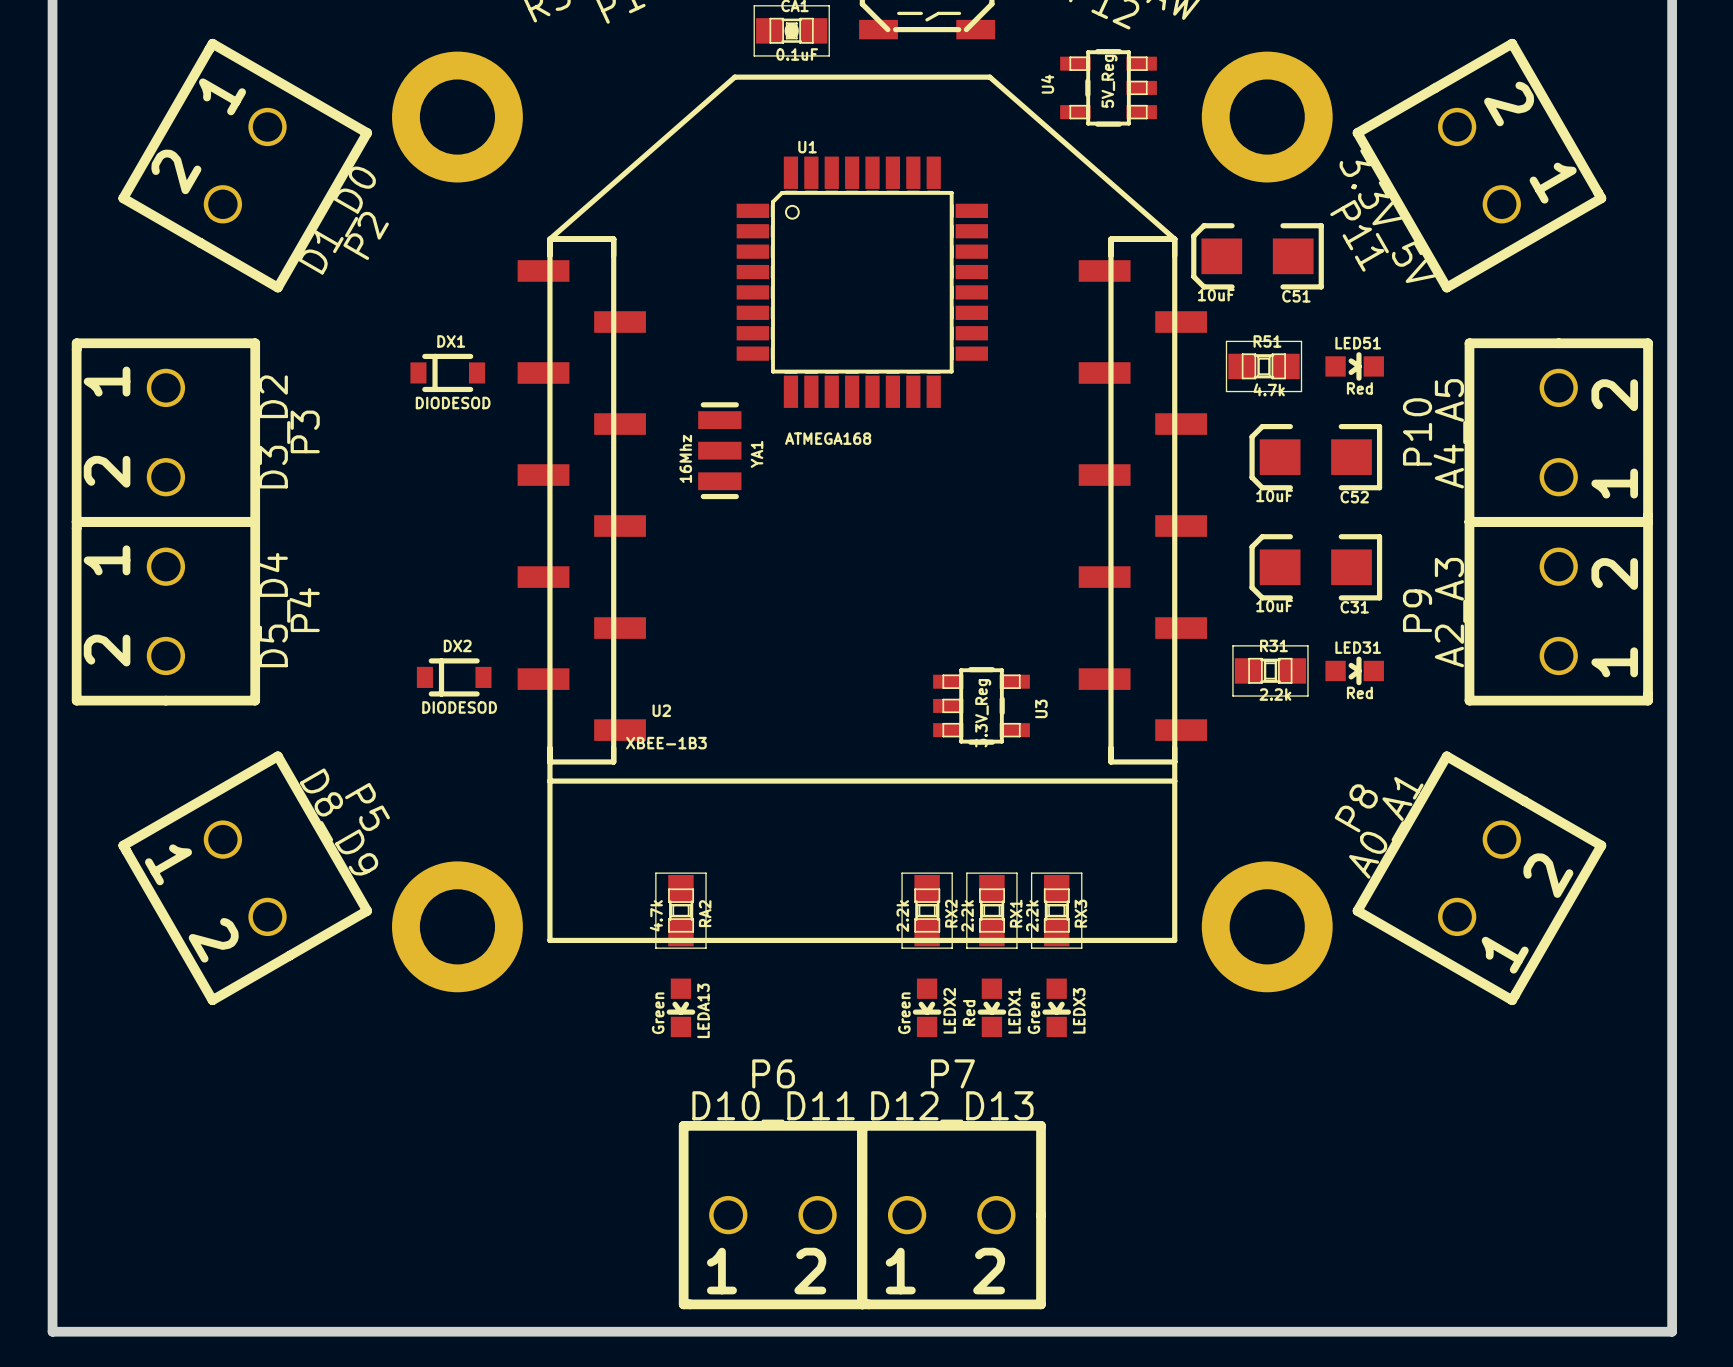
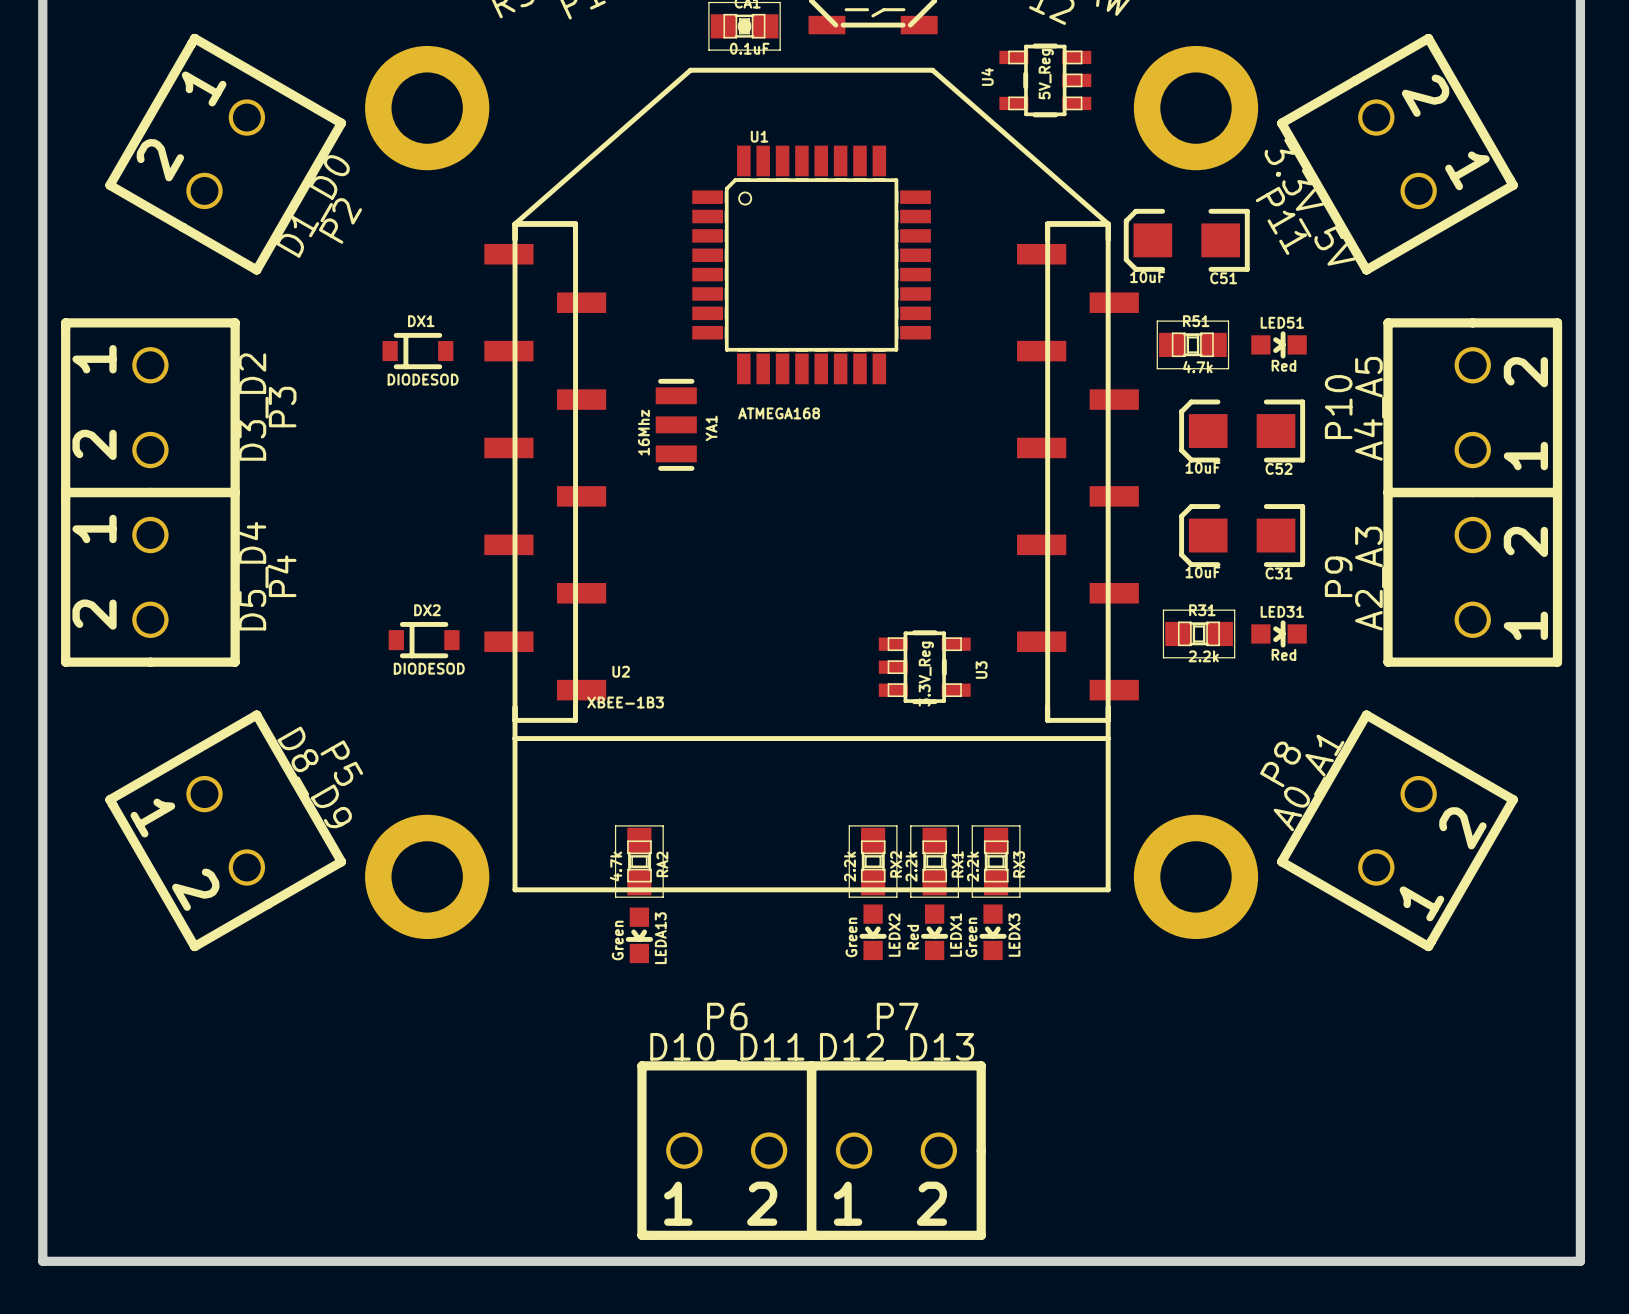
LEDA13 position: (680, 1007) -> (639, 935)
LEDX2 position: (927, 1007) -> (873, 932)
LEDX1 position: (991, 1007) -> (934, 932)
LEDX3 position: (1056, 1007) -> (993, 932)

